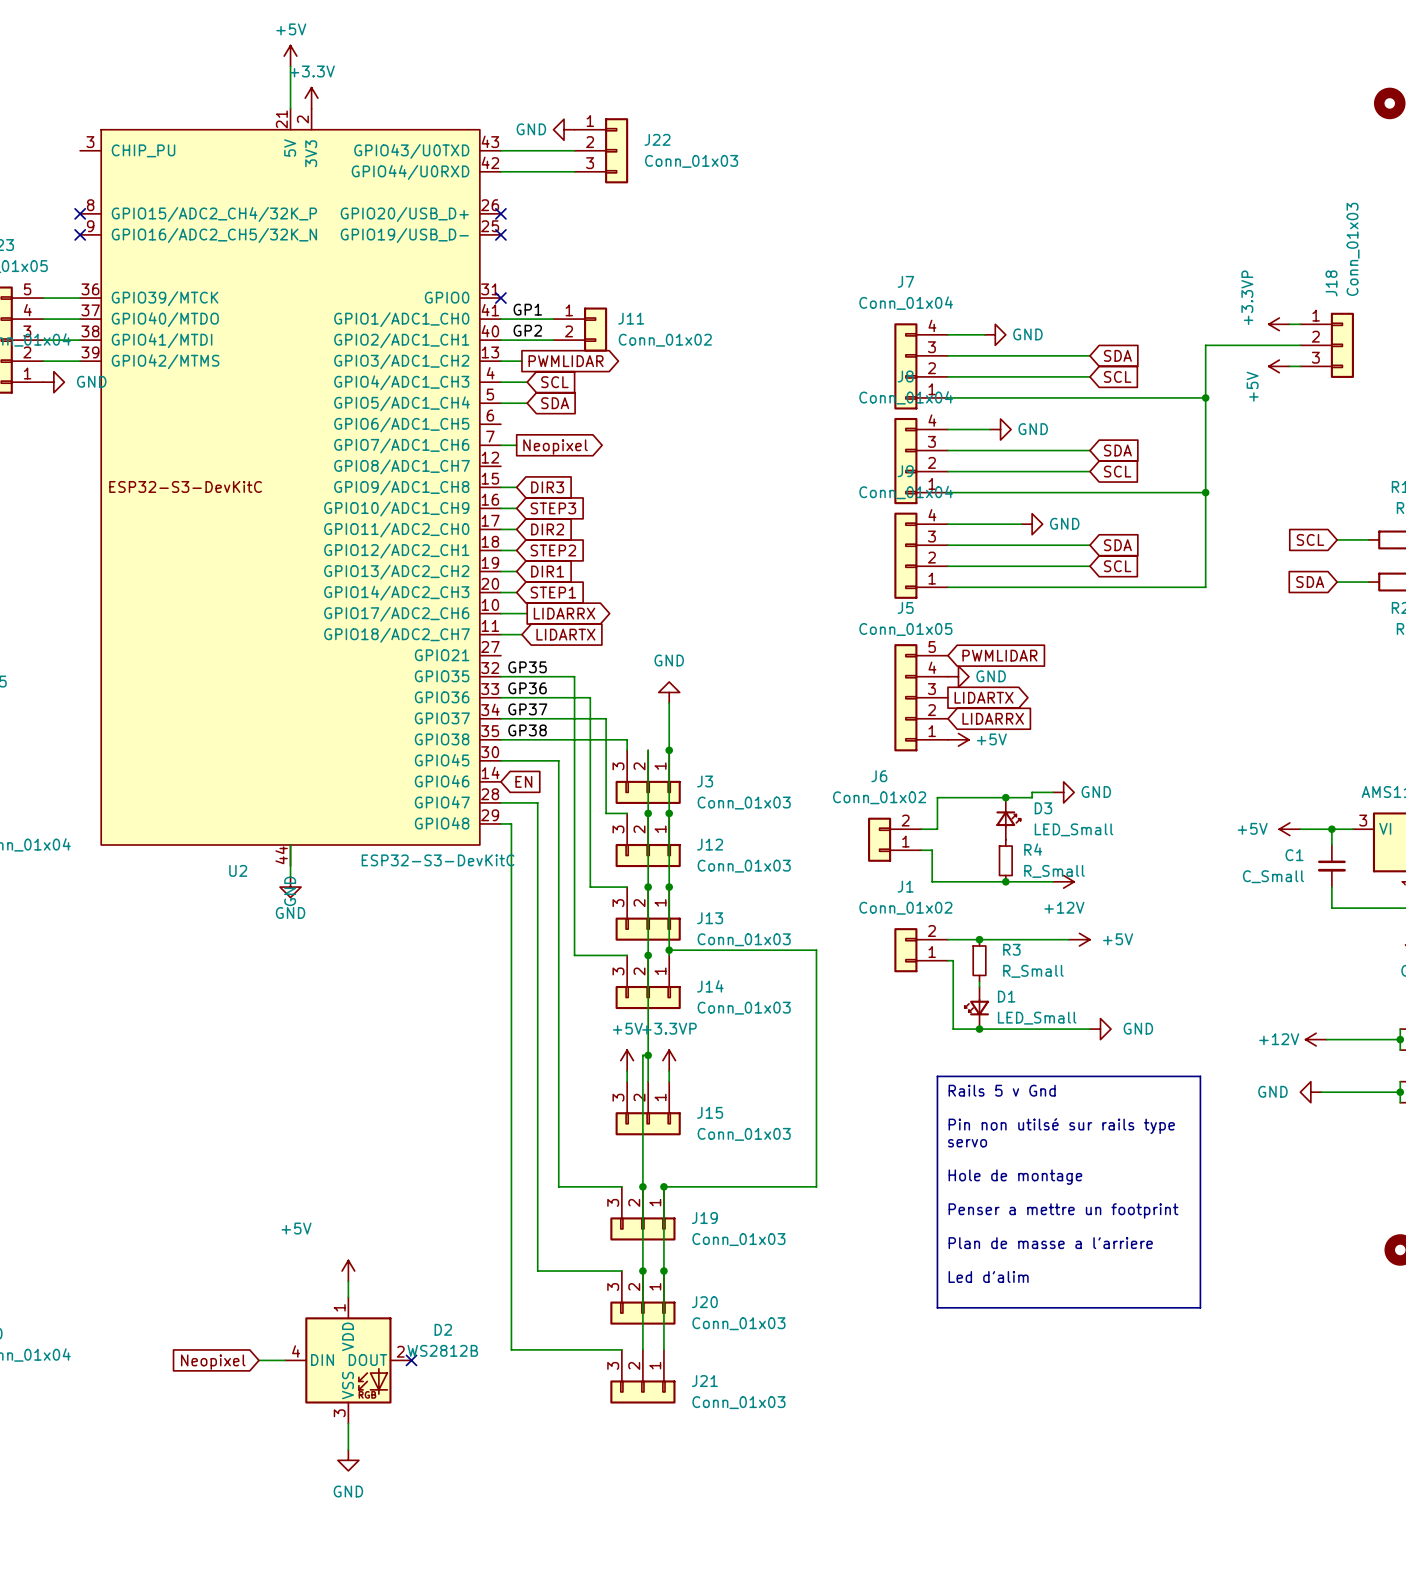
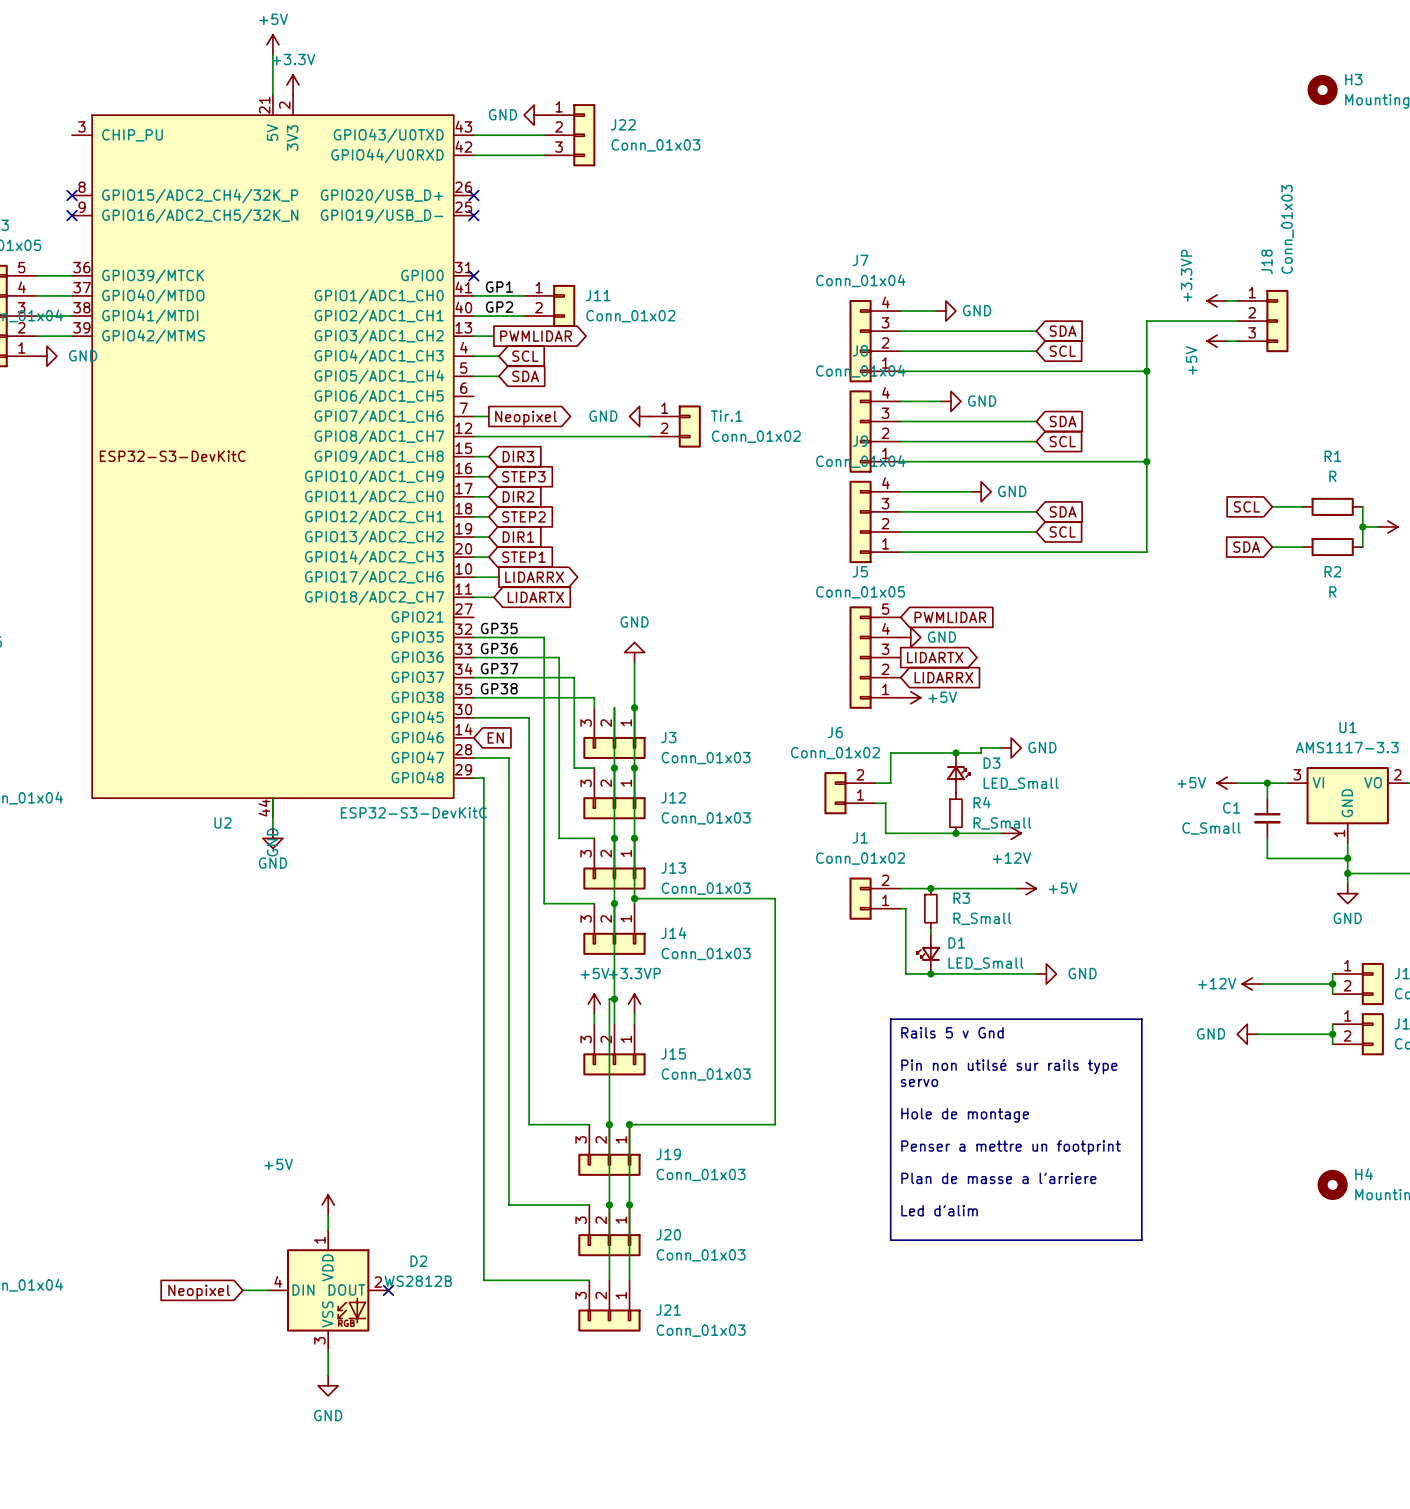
power symbol: none -> GND (639, 416)
Tir.1: none -> Conn_01x02 (675, 426)
wire: none -> (473, 436) (649, 436)

